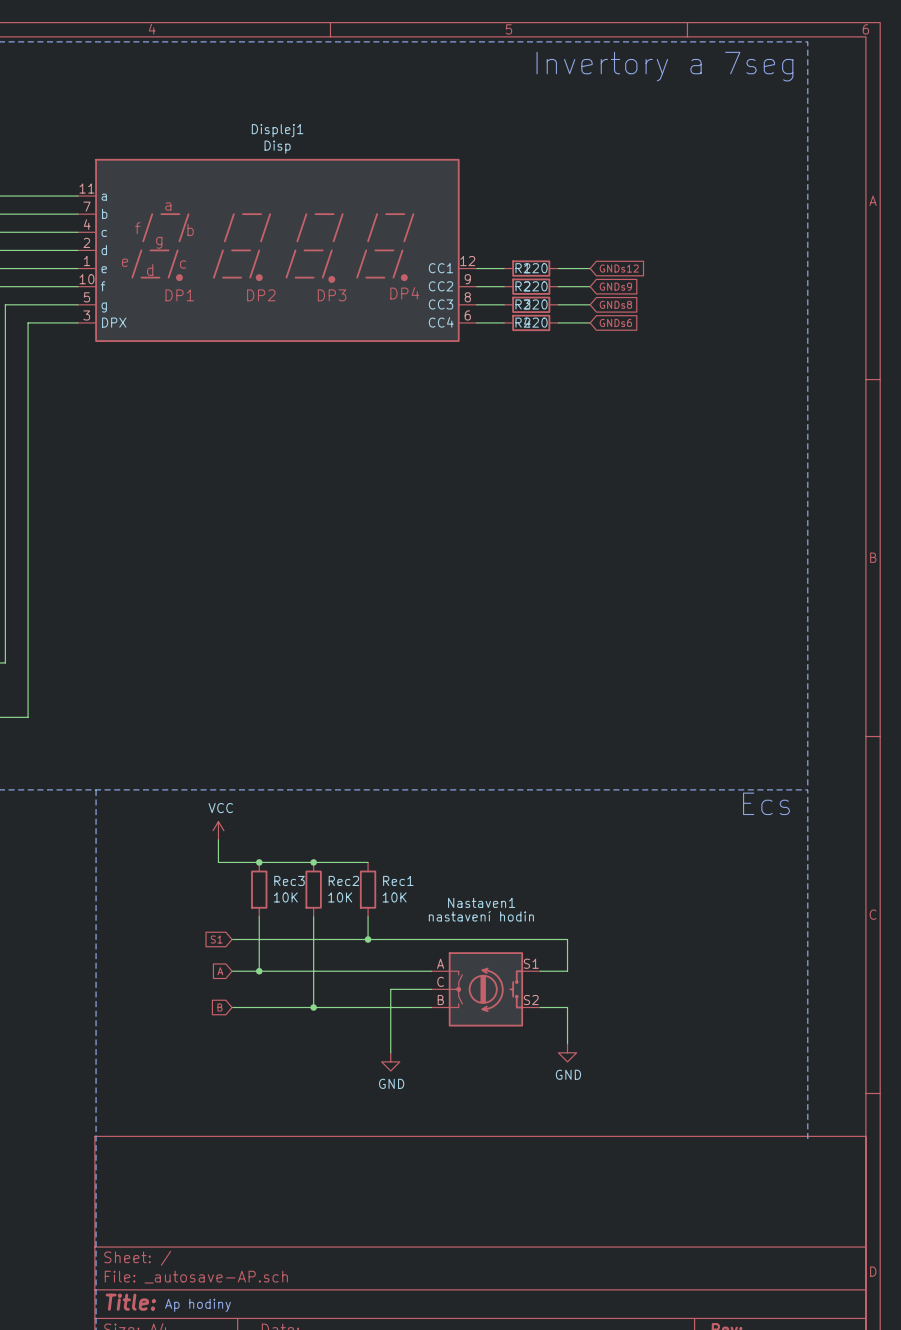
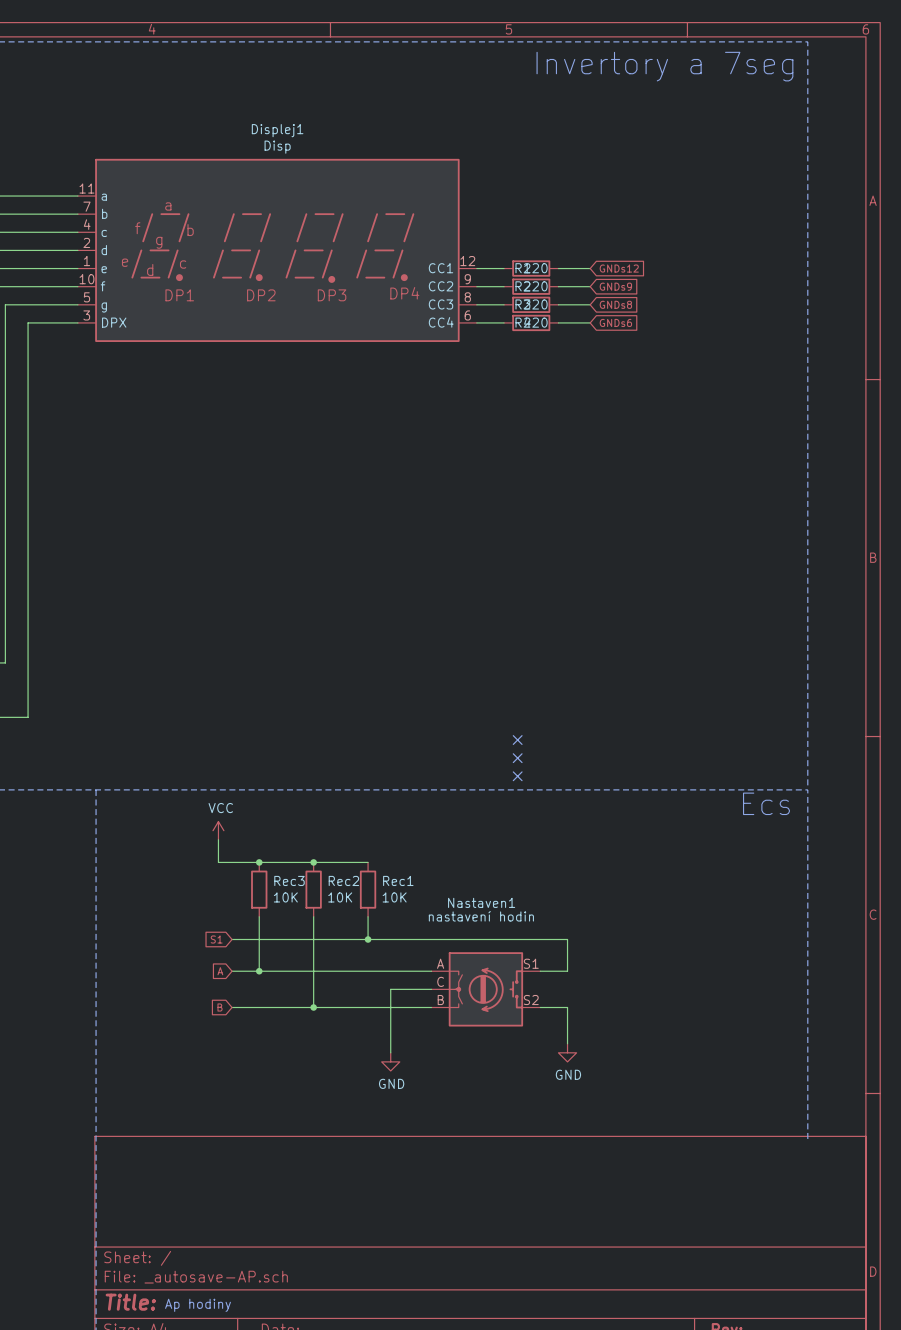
no-connect mark: none -> (517, 740)
no-connect mark: none -> (517, 758)
no-connect mark: none -> (517, 776)

